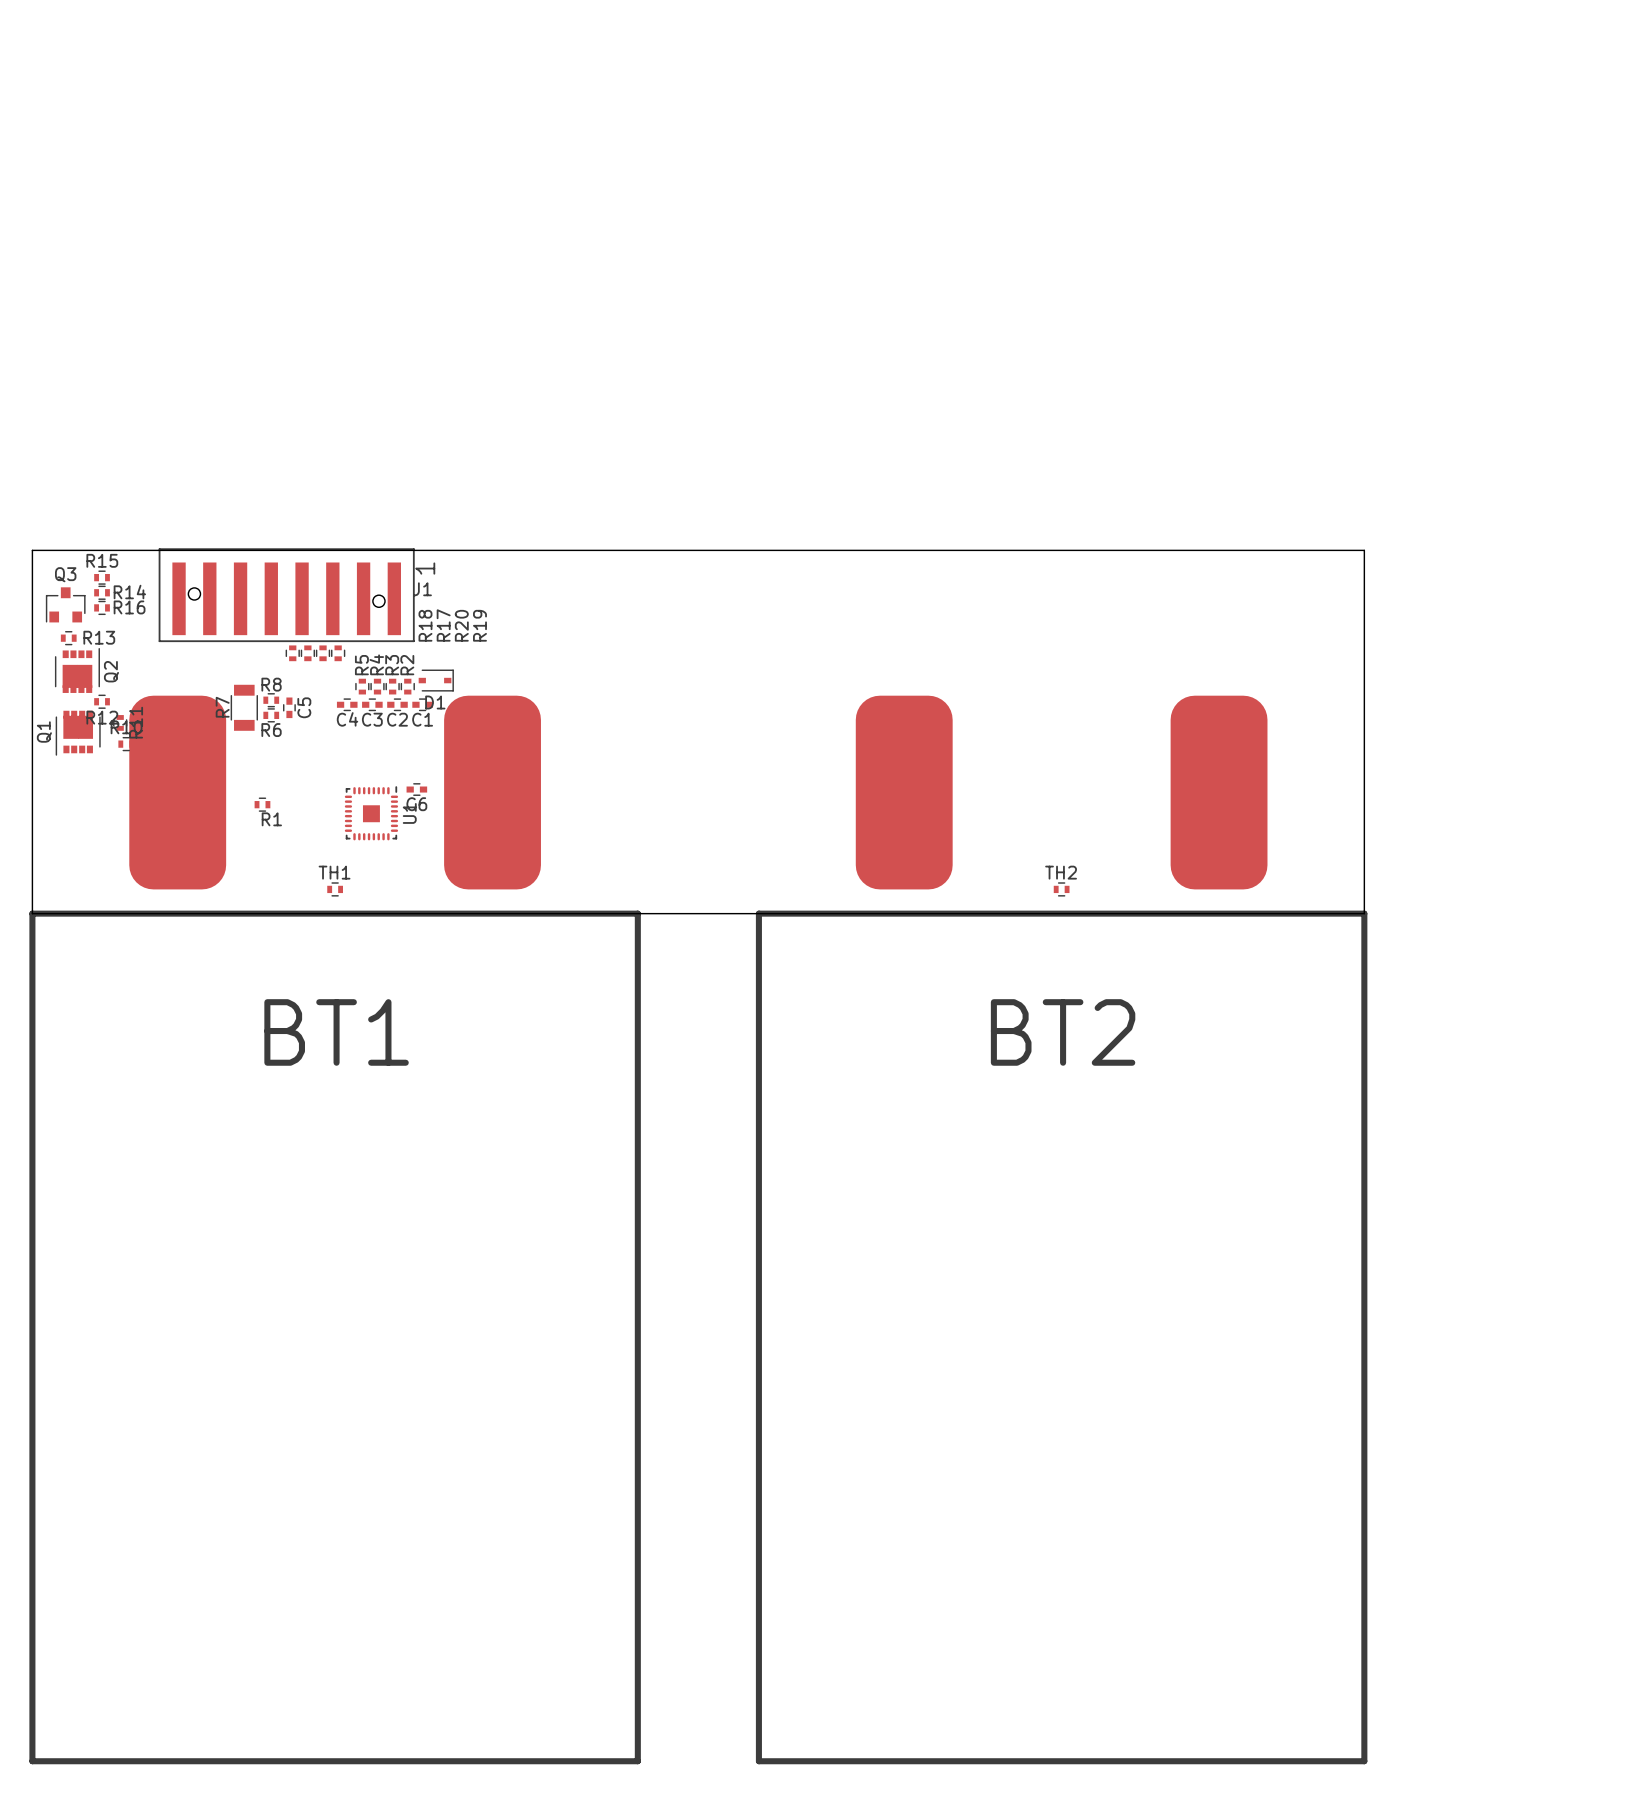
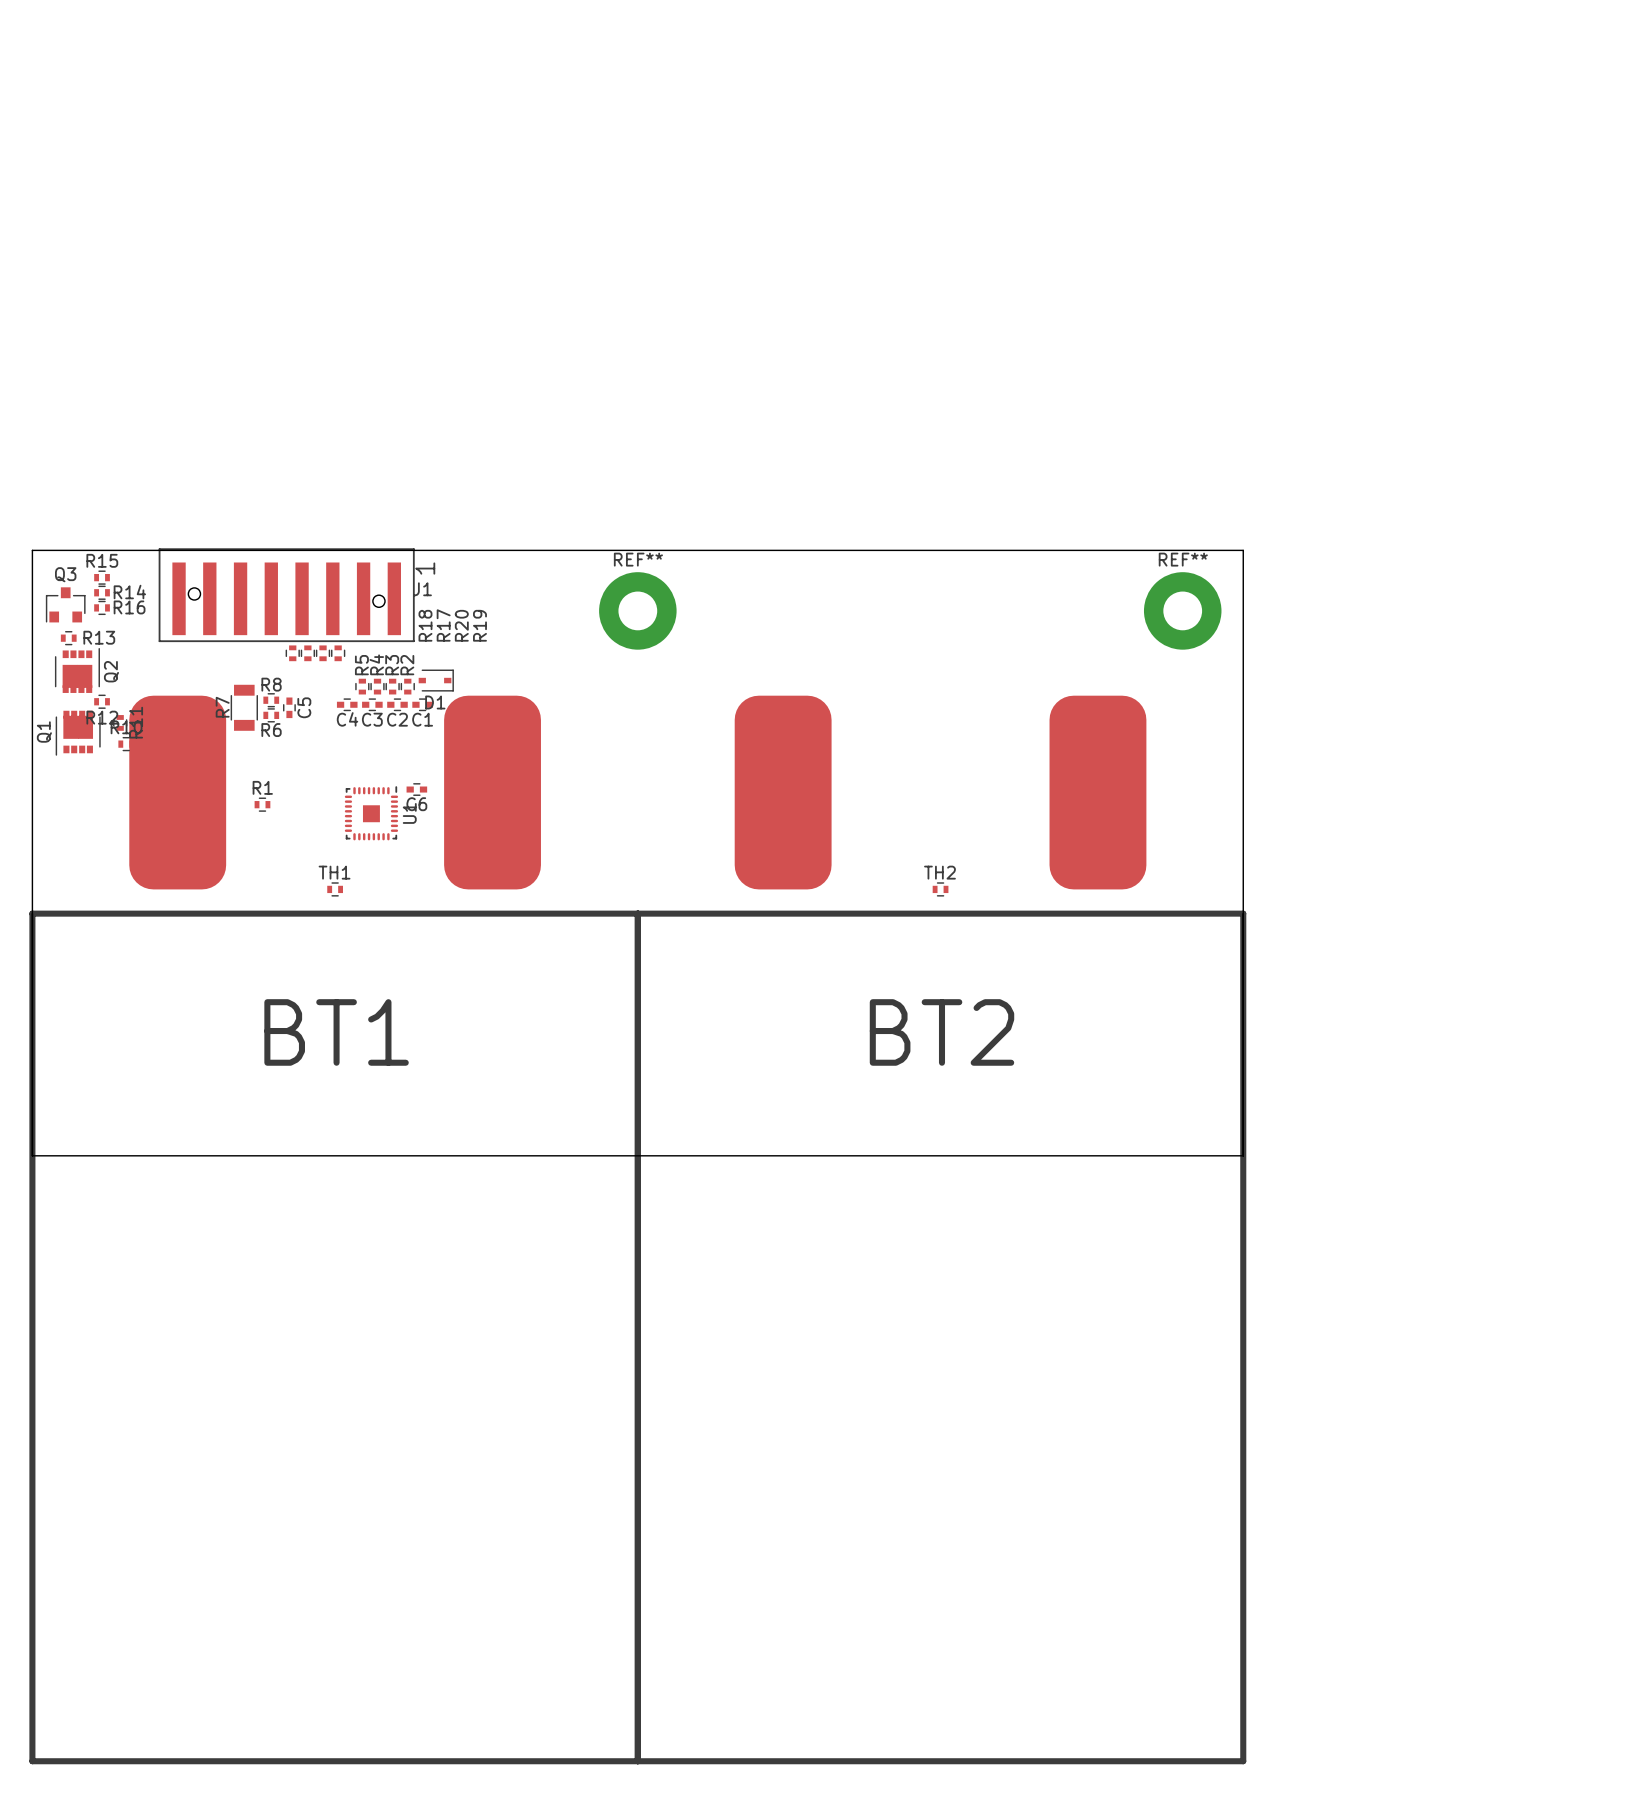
board edge: (1243, 550) (1364, 550) (1364, 913) (32, 913) -> (1243, 550) (1243, 1155) (32, 1155) (32, 913)
REF**: none -> (637, 610)
REF**: none -> (1182, 610)
R1 name position: R1 (271, 819) -> R1 (262, 787)
TH2 position: (1061, 889) -> (940, 889)
BT2 position: (1061, 1229) -> (940, 1229)

